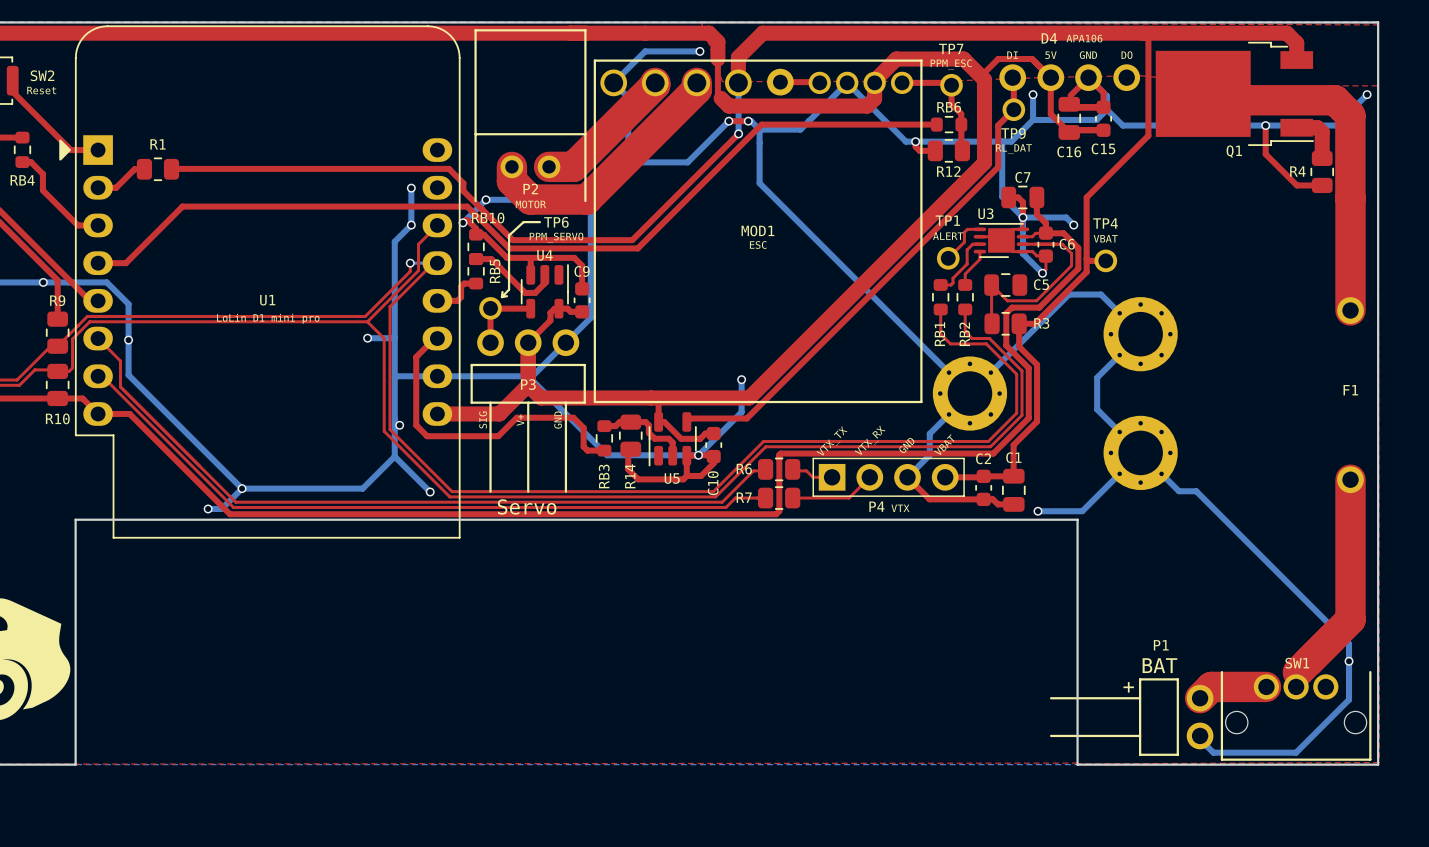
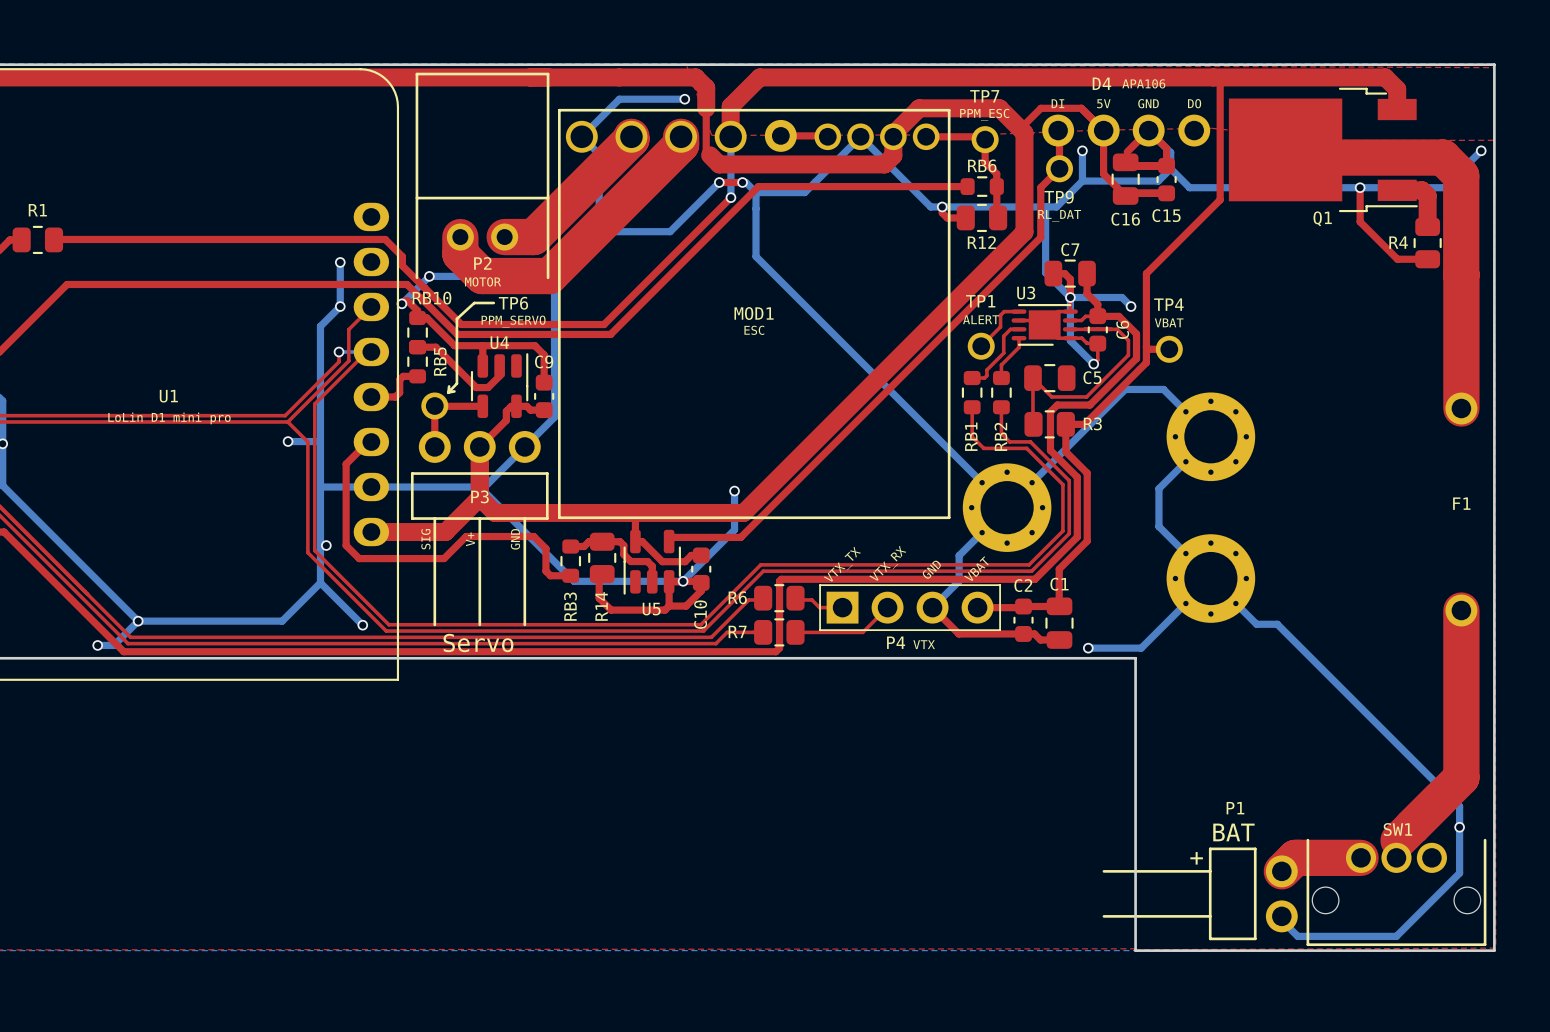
C6 name rotation: 0° (1067, 244) -> 90° counterclockwise (1122, 329)

